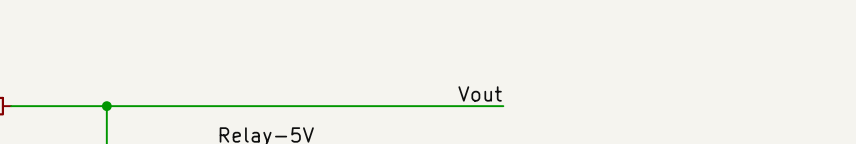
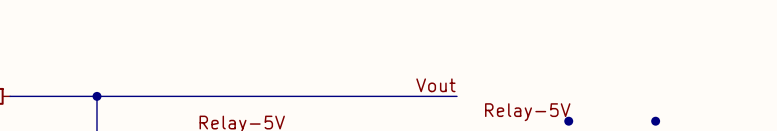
label: none -> Relay-5V (527, 112)
junction: none -> (568, 121)
junction: none -> (655, 121)

